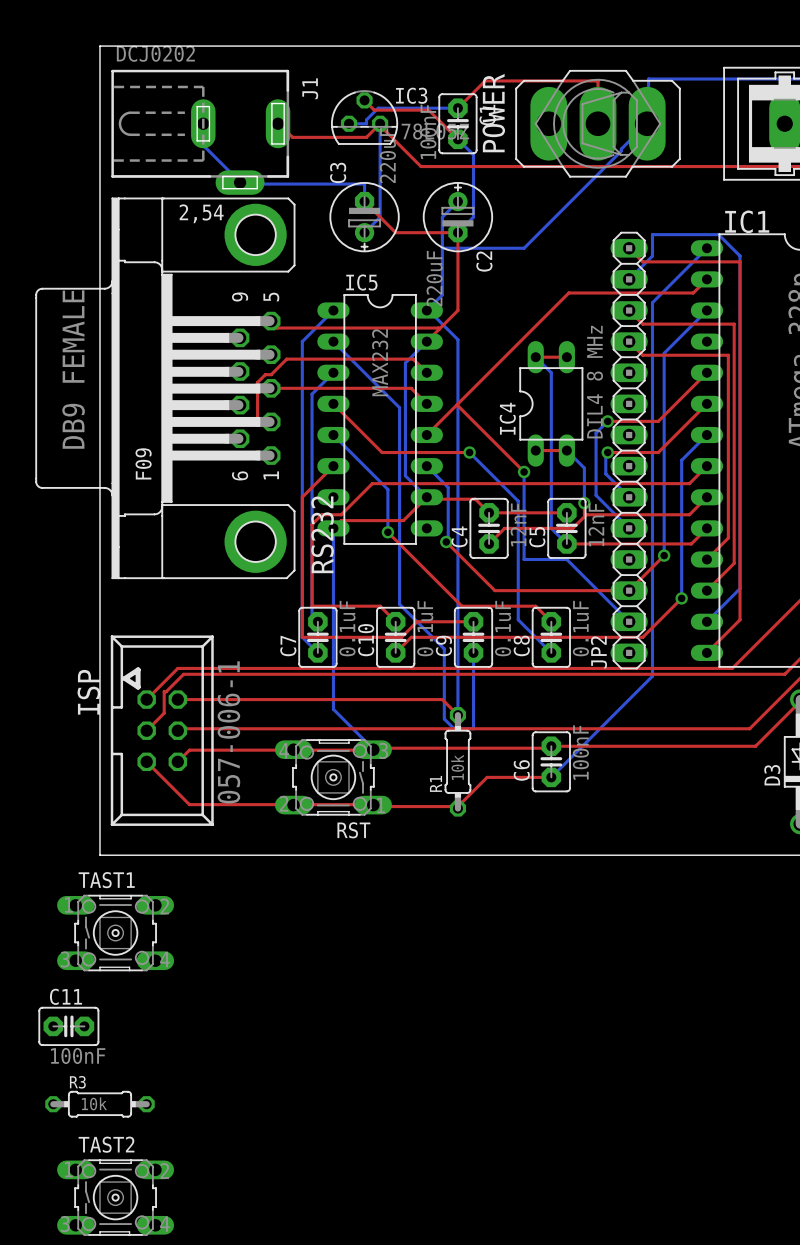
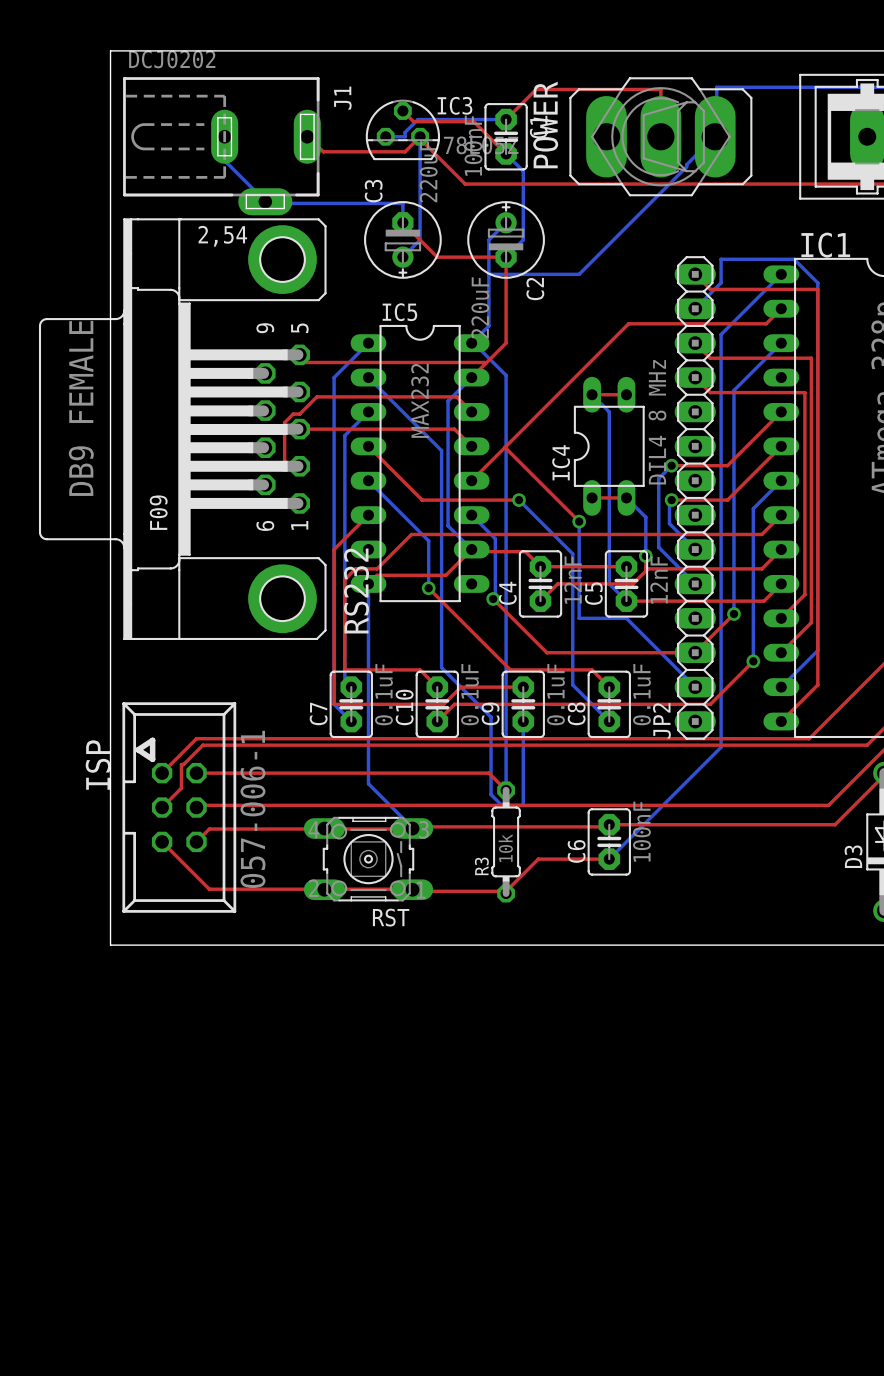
R1 name: R1 (436, 783) -> R3 (481, 866)
TAST1: (115, 933) -> none
C11: 100nF (68, 1026) -> none
R3: 10k (100, 1104) -> none
TAST2: (115, 1197) -> none

